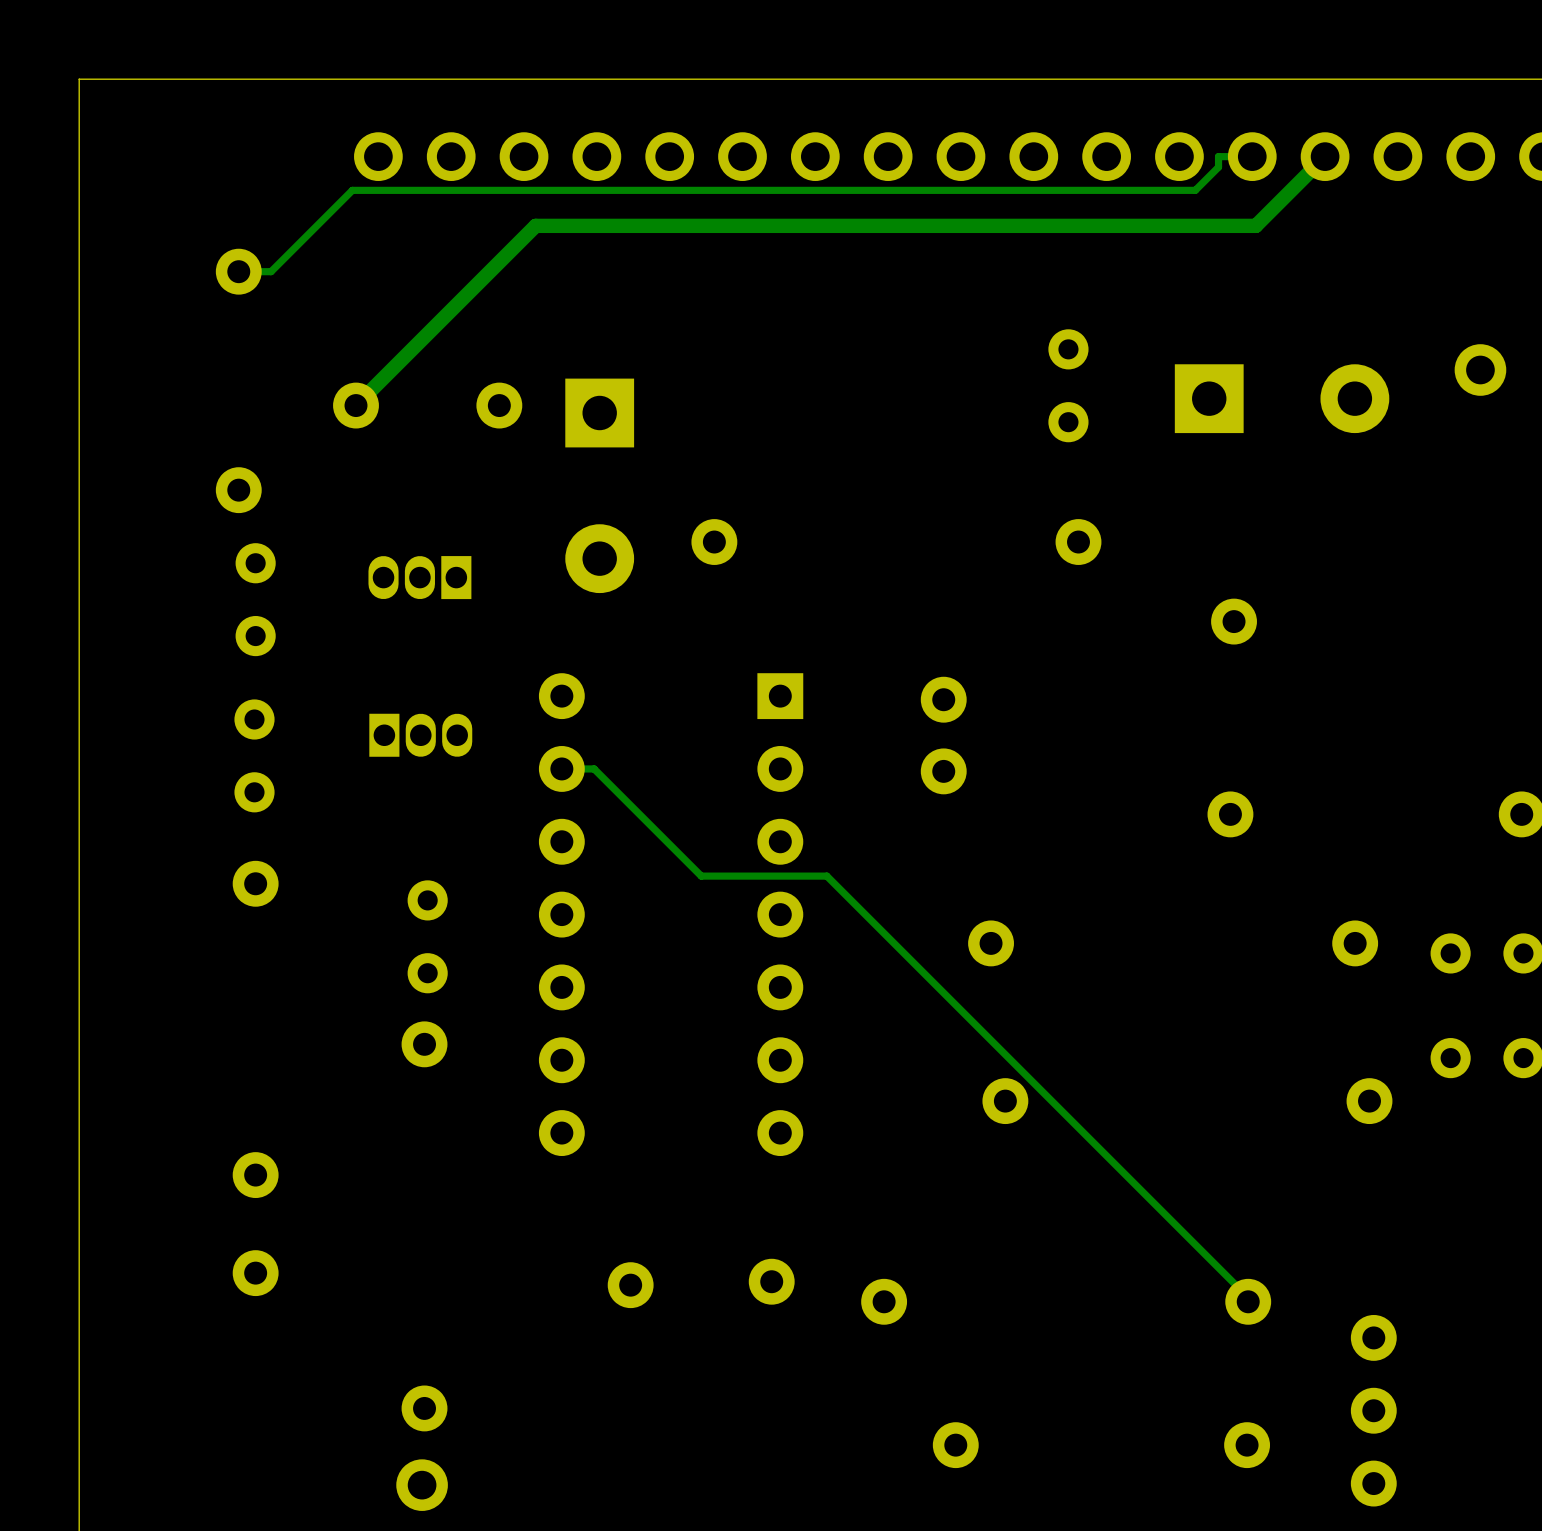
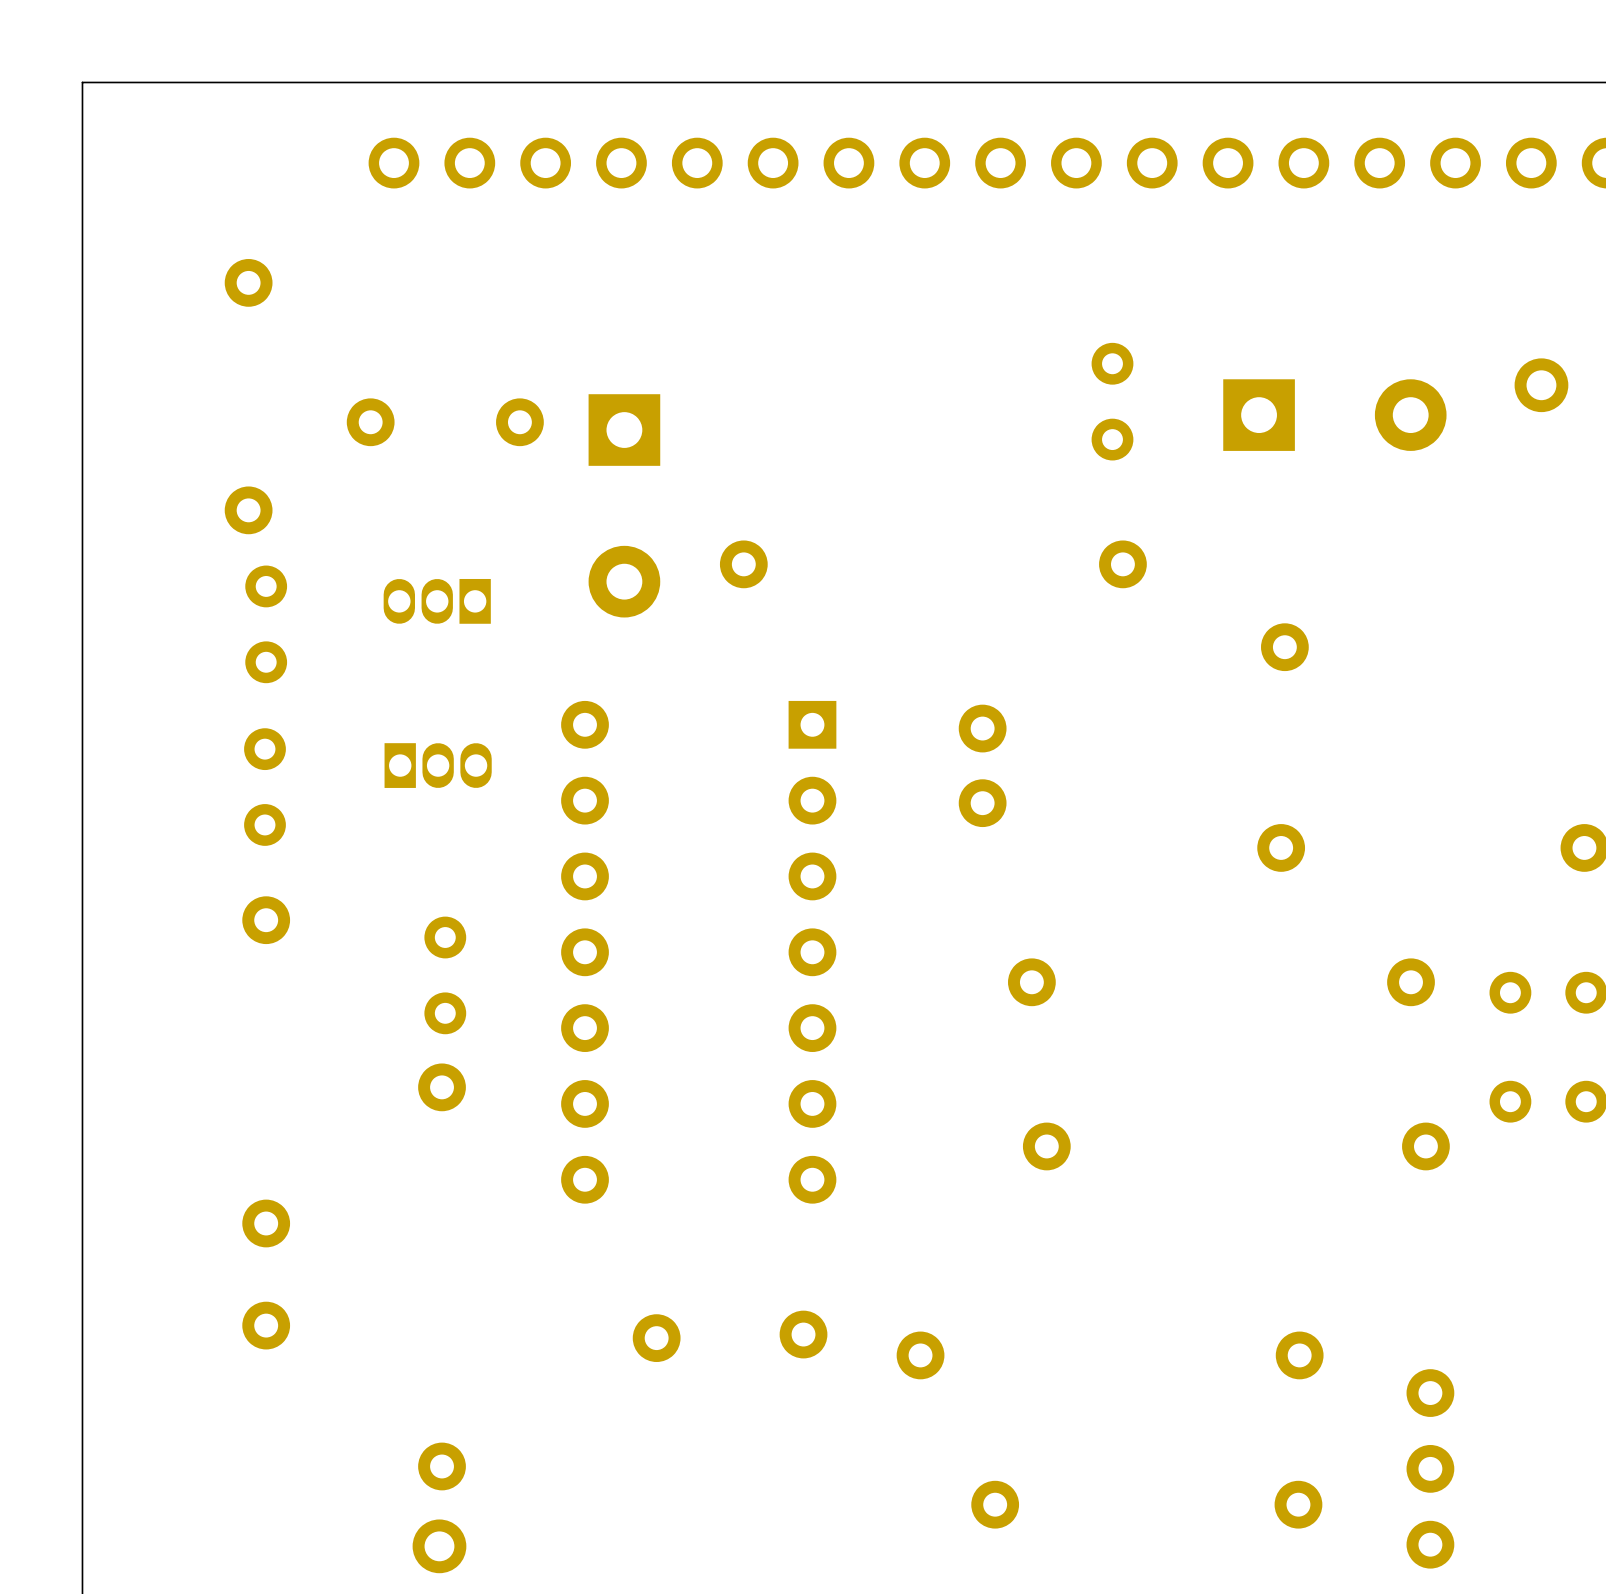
track: (1252, 156) (1218, 156) (1218, 167) (1195, 190) (352, 190) (271, 271) (238, 271) -> none
track: (1325, 156) (1255, 225) (535, 225) (355, 405) -> none
track: (561, 768) (594, 768) (701, 876) (826, 876) (1248, 1297) (1248, 1301) -> none

